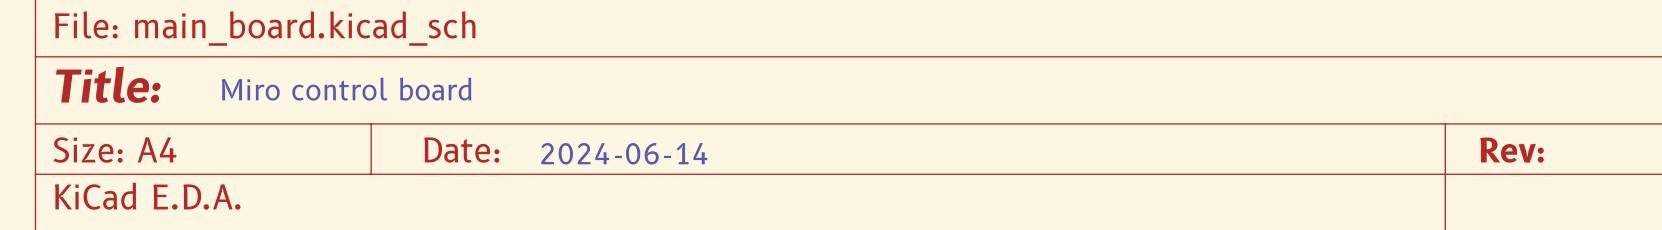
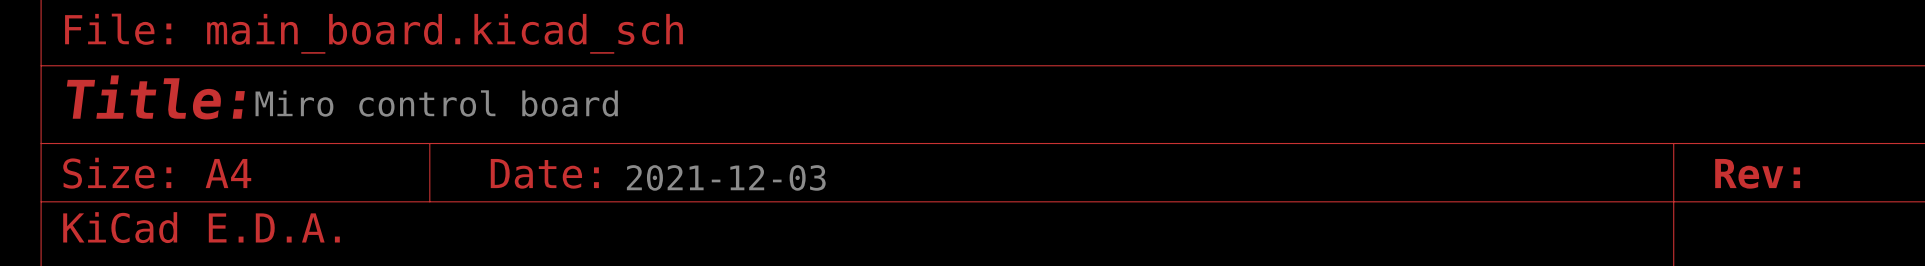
text: 2024-06-14 (624, 153) -> 2021-12-03 (726, 177)

